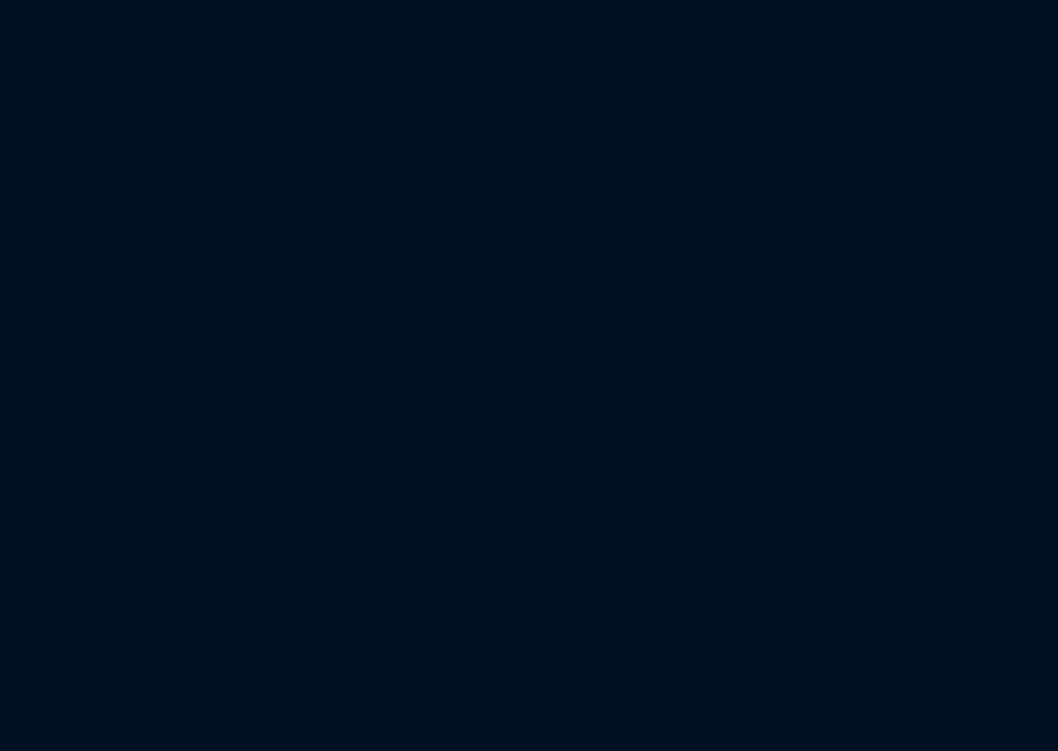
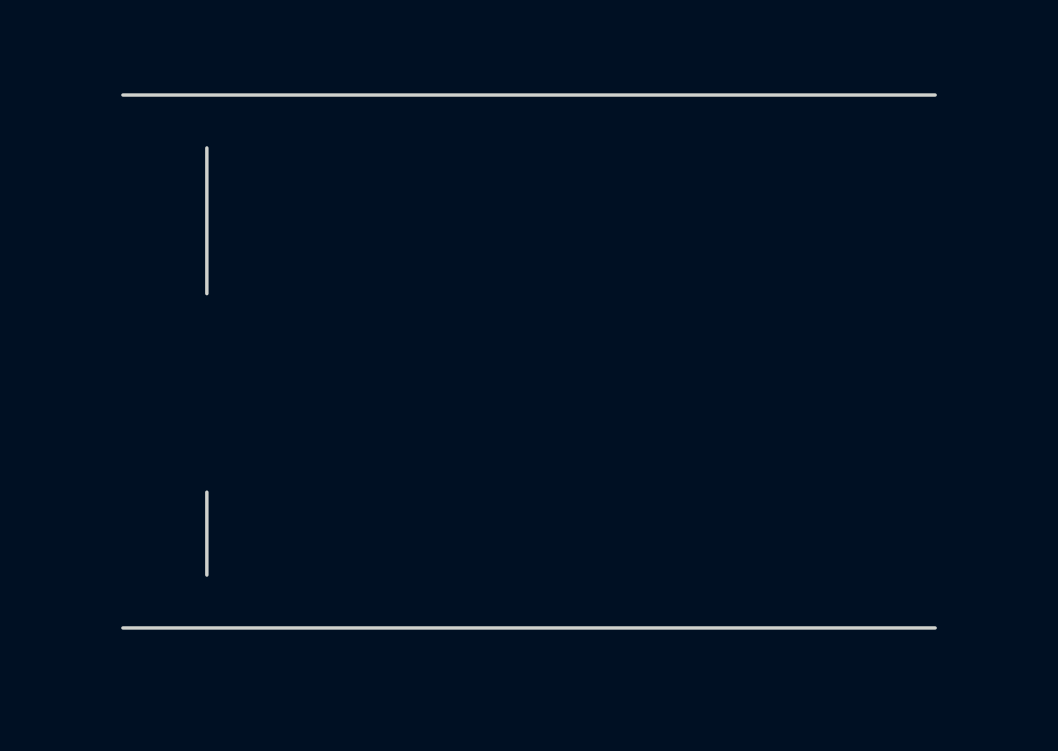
board edge: none -> (935, 95) (122, 95)
board edge: none -> (206, 147) (206, 293)
board edge: none -> (206, 492) (206, 575)
board edge: none -> (935, 627) (122, 627)

